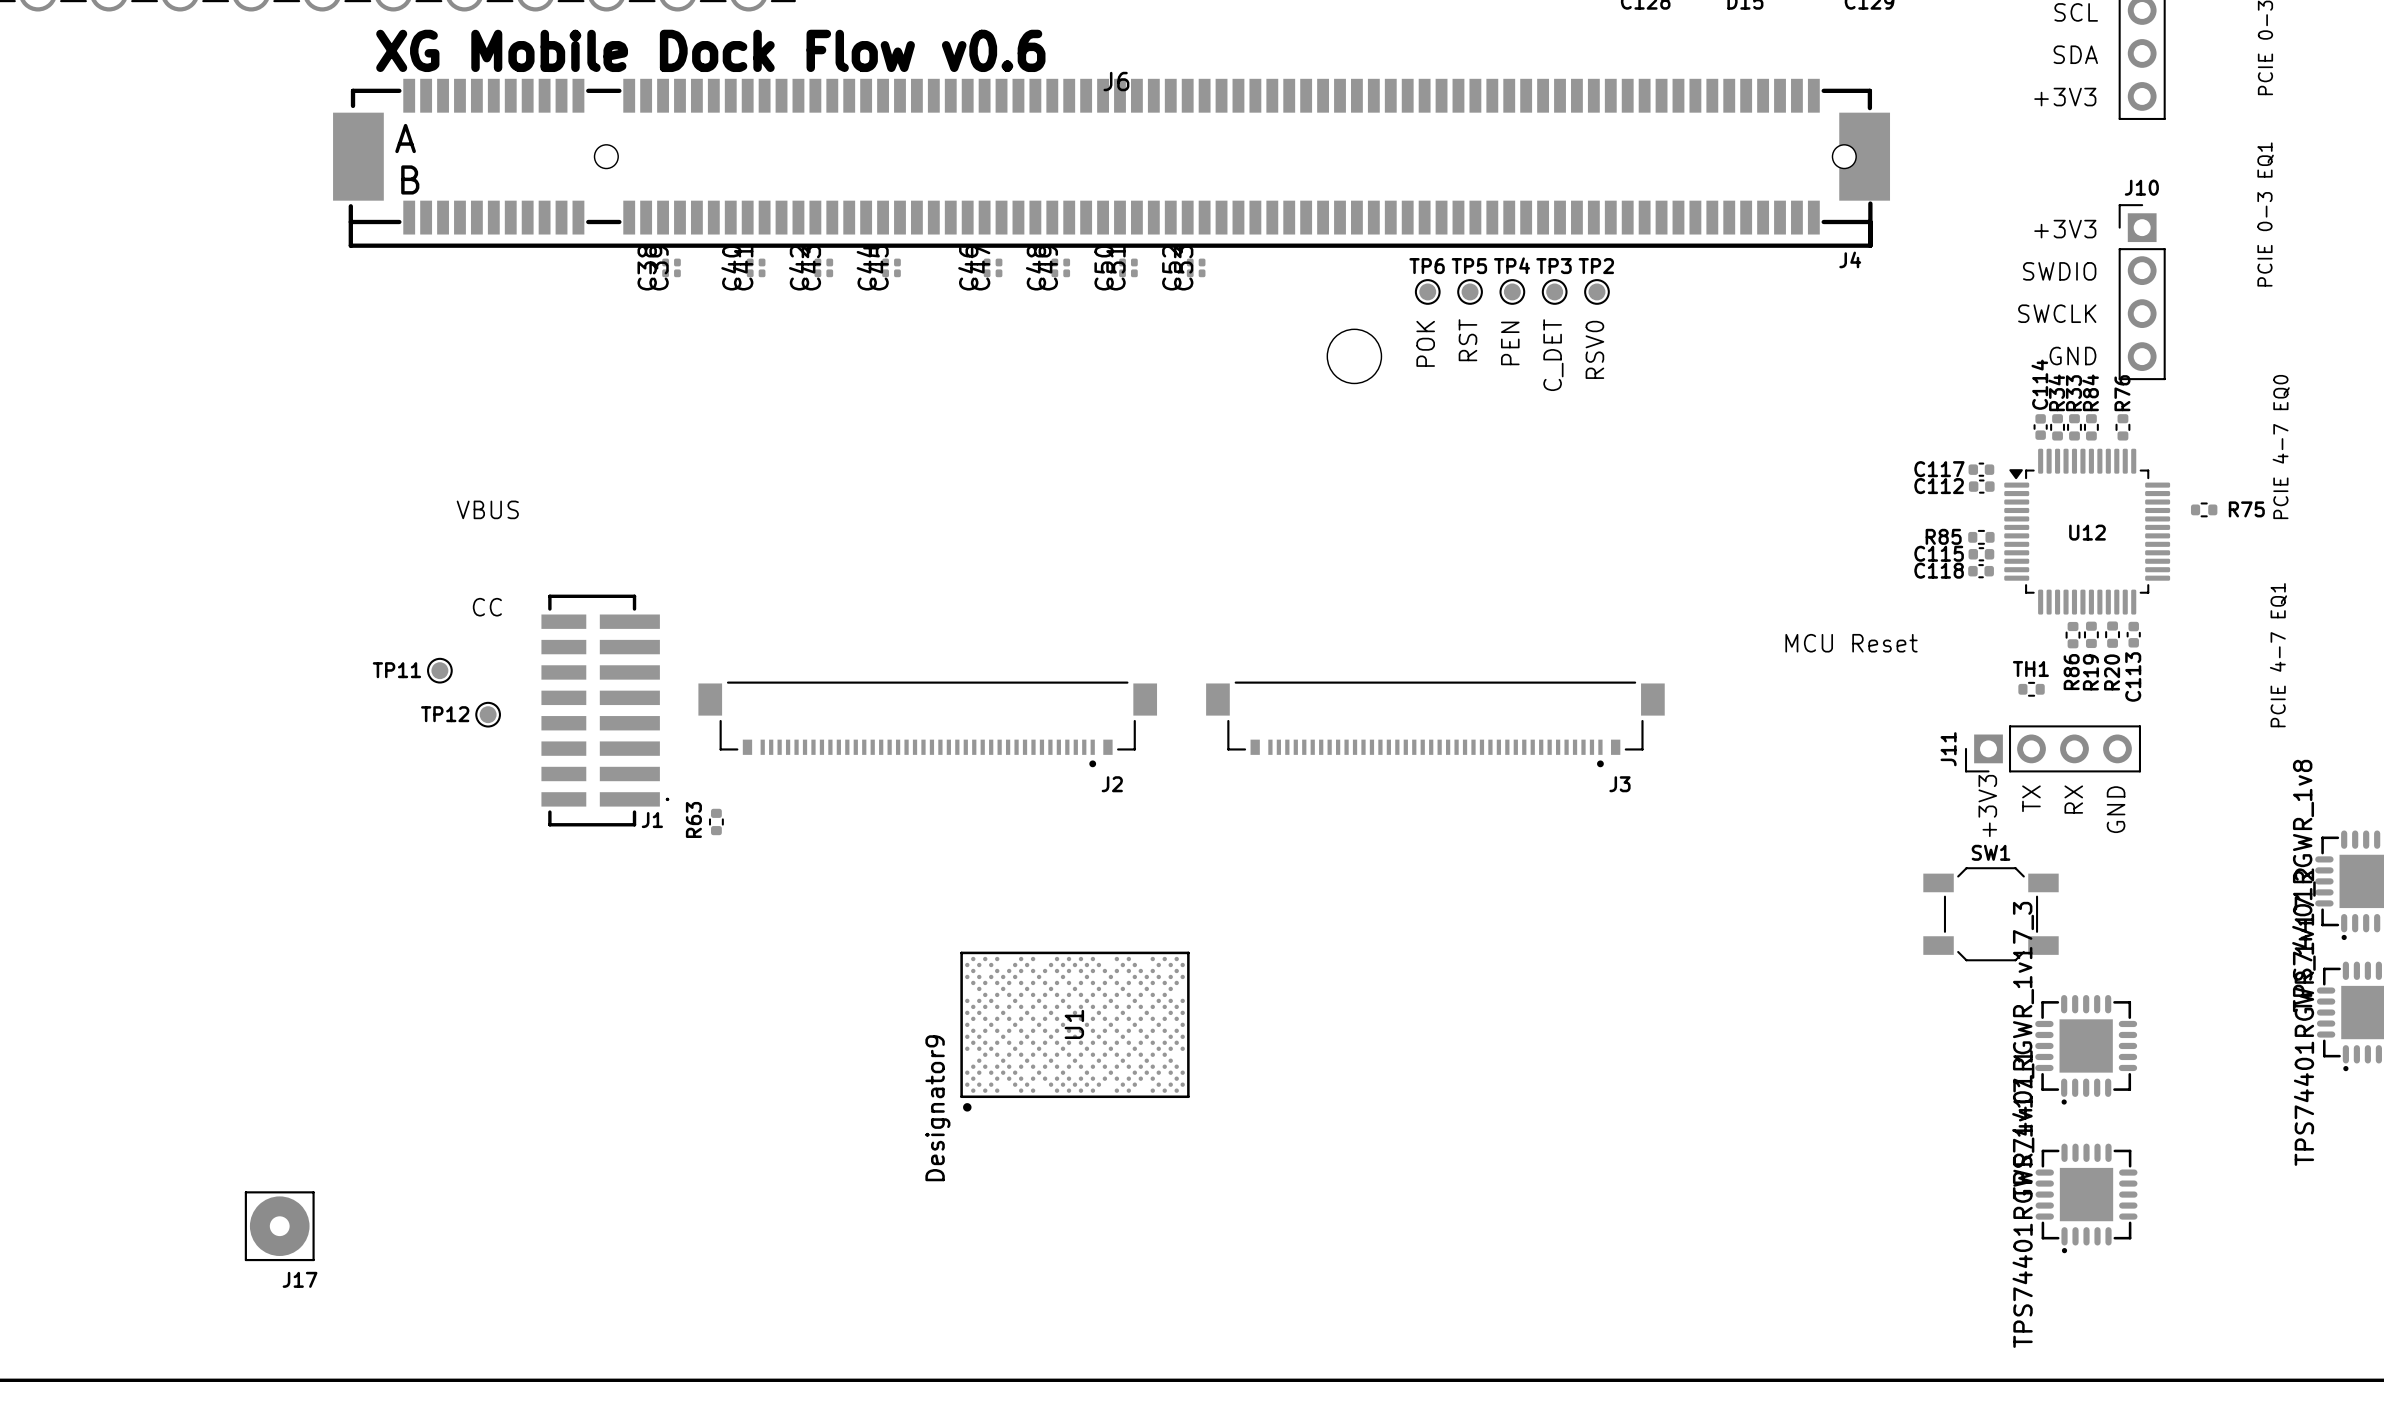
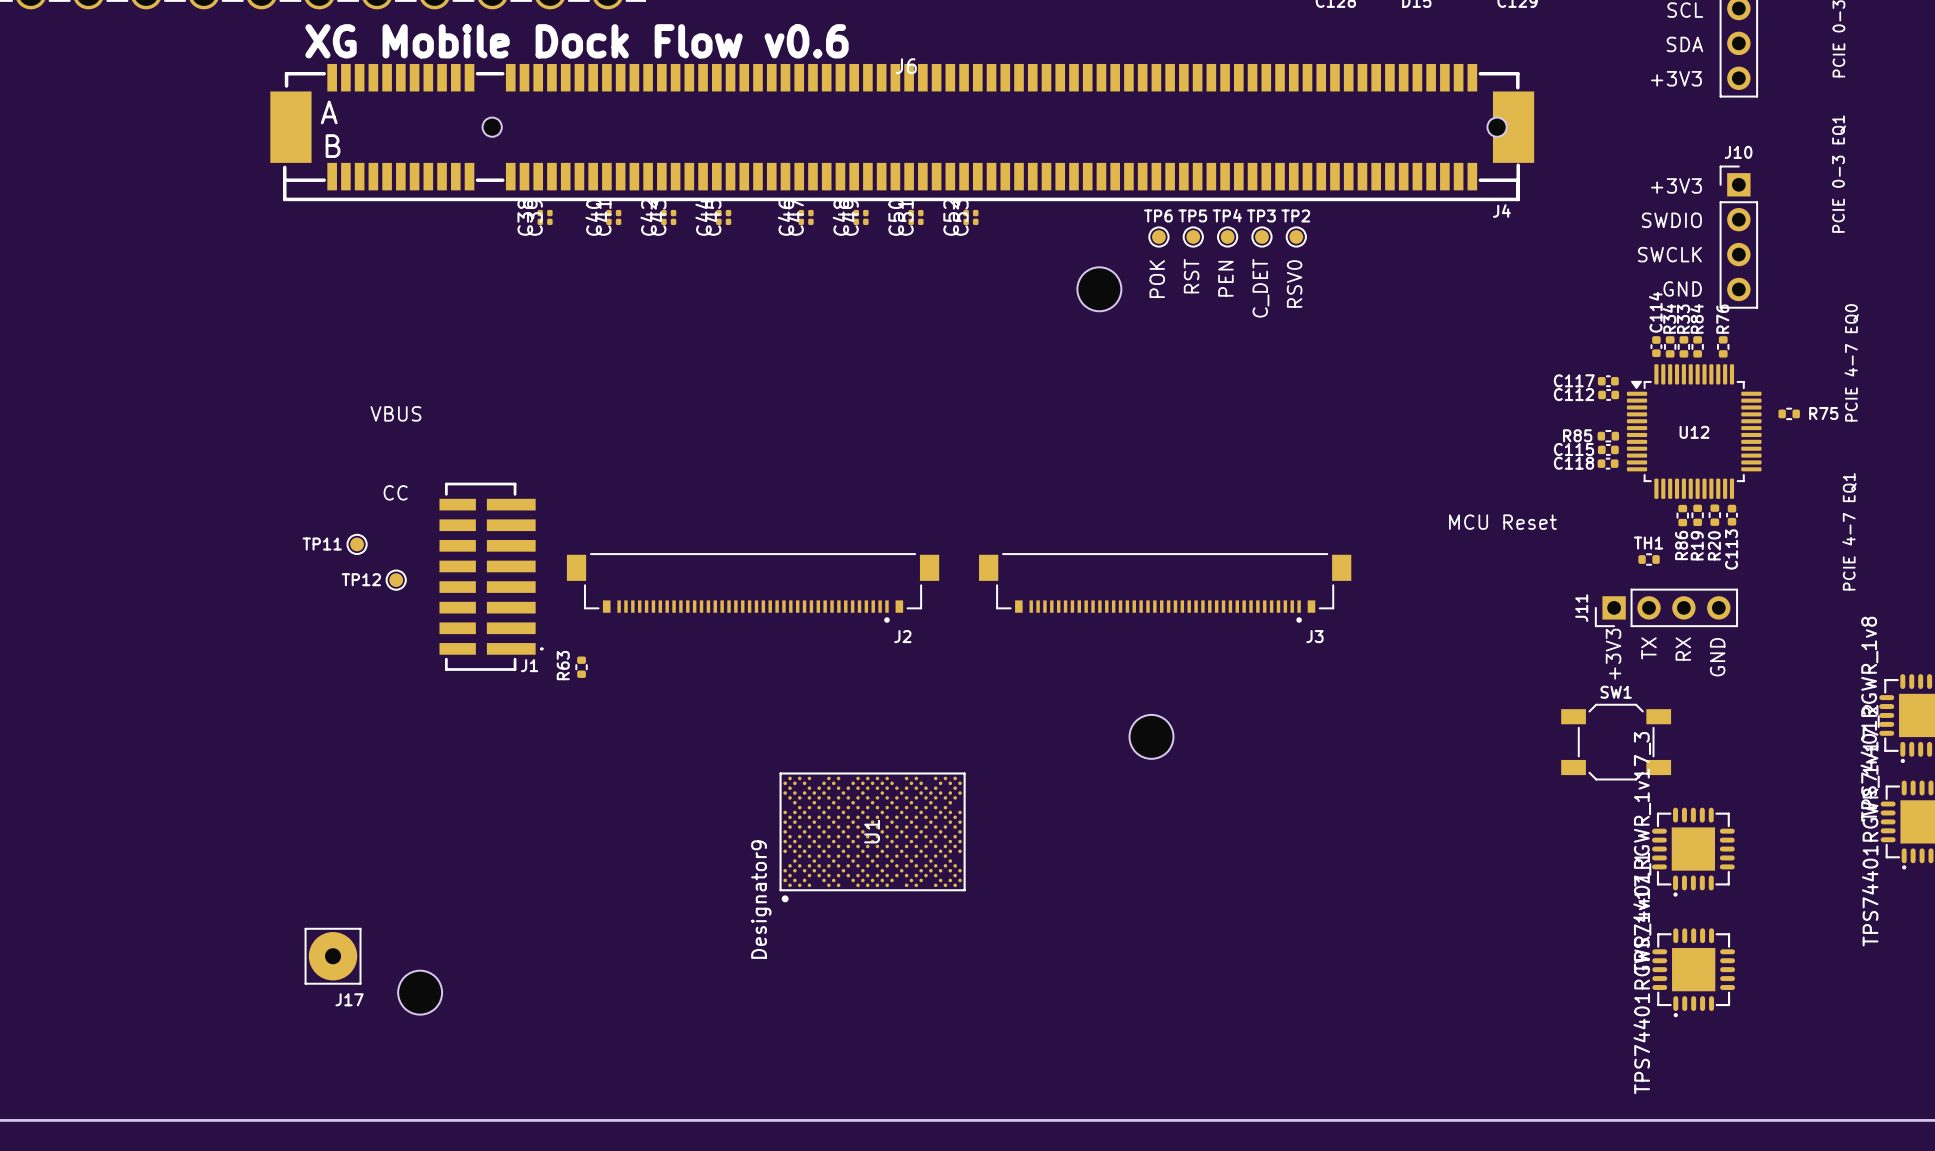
part: none -> (1151, 736)
part: none -> (420, 992)
J17 position: (279, 1226) -> (333, 956)

